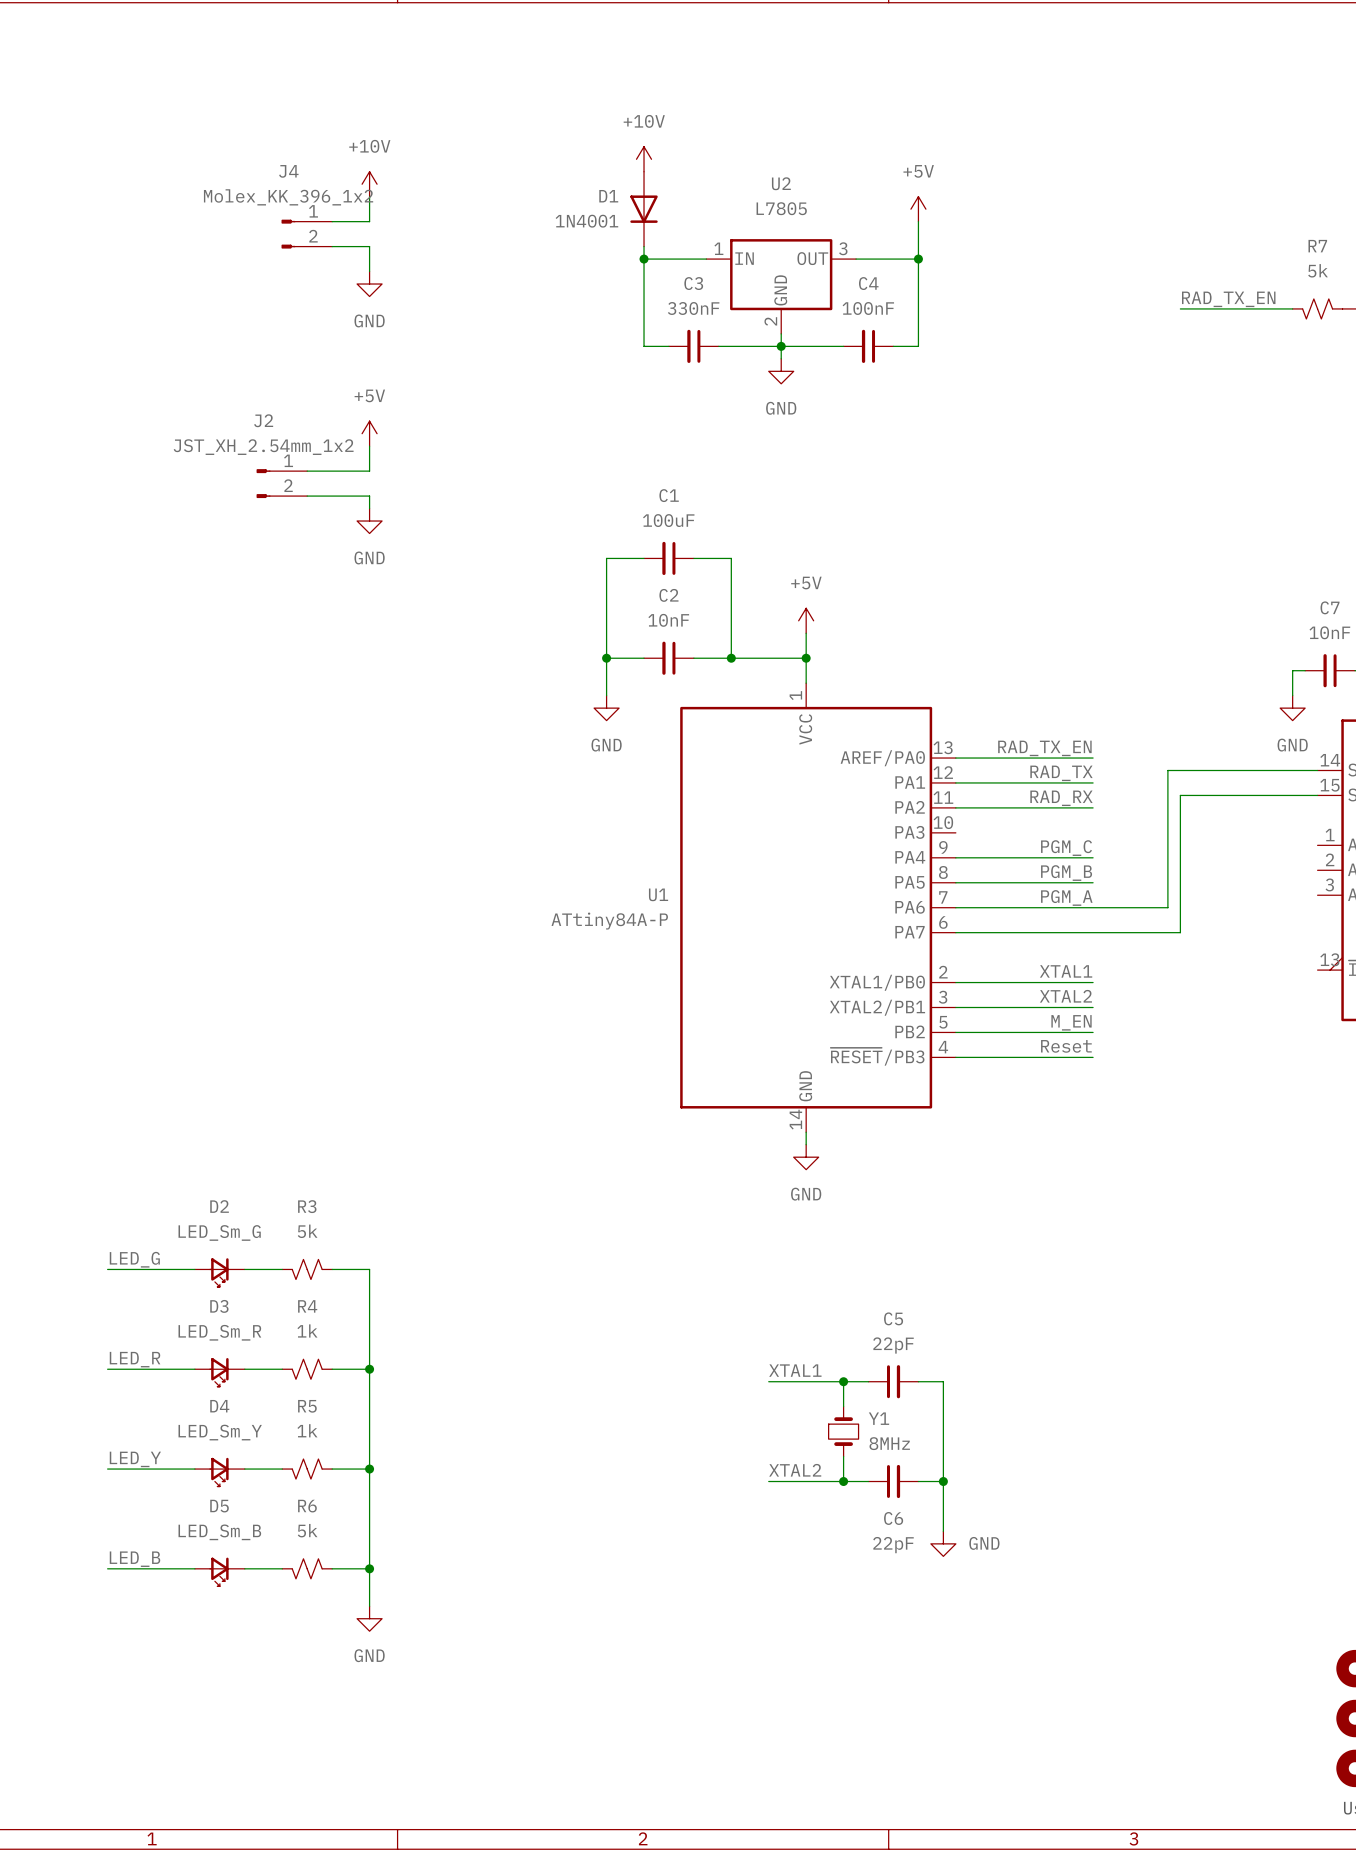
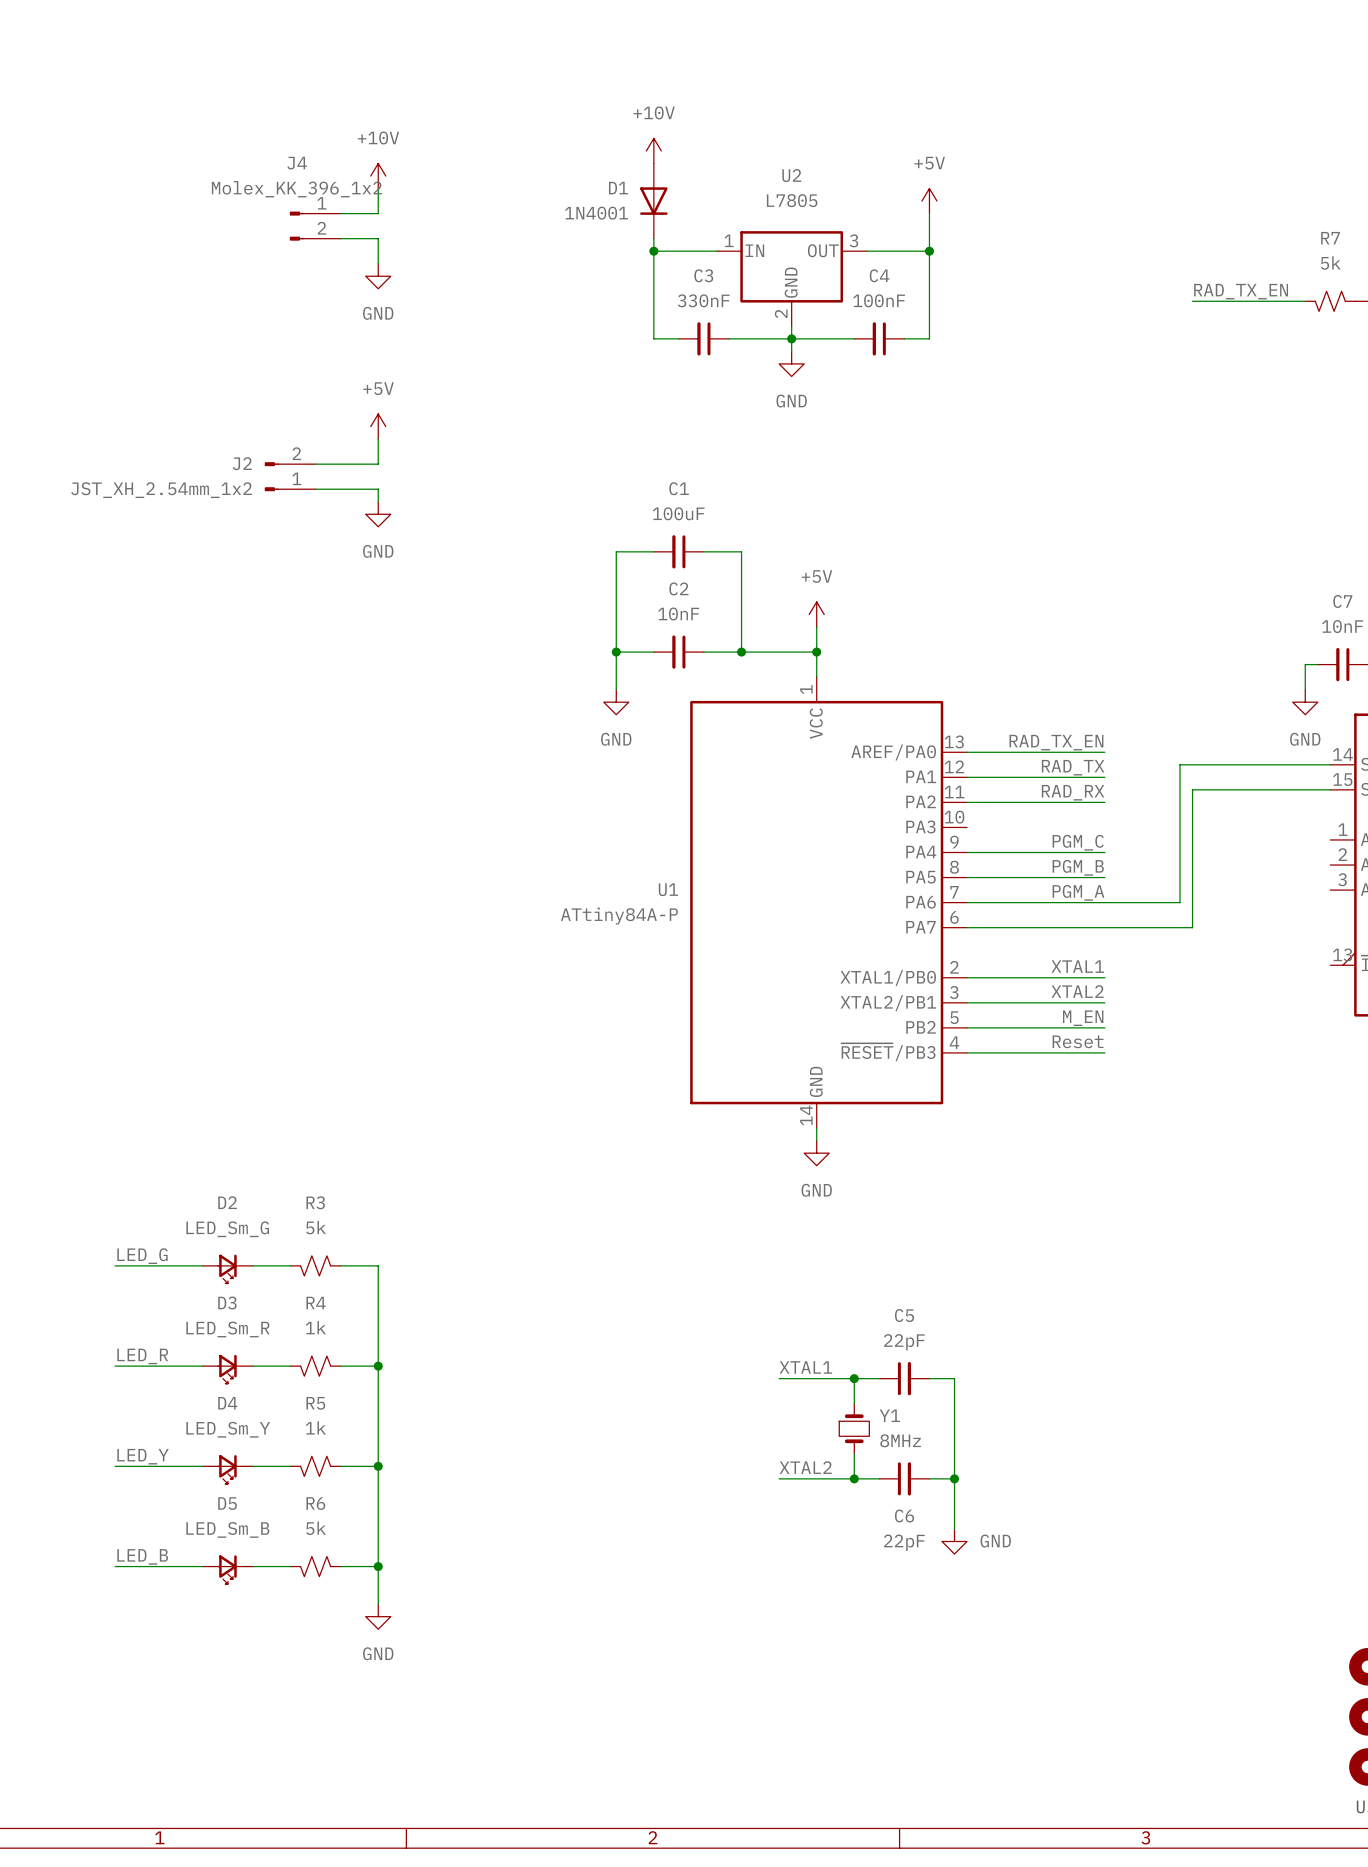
J2 name position: J2 (263, 420) -> J2 (242, 463)
J2 value position: JST_XH_2.54mm_1x2 (263, 447) -> JST_XH_2.54mm_1x2 (161, 490)
J2 flip: as is (263, 483) -> up-down (271, 476)

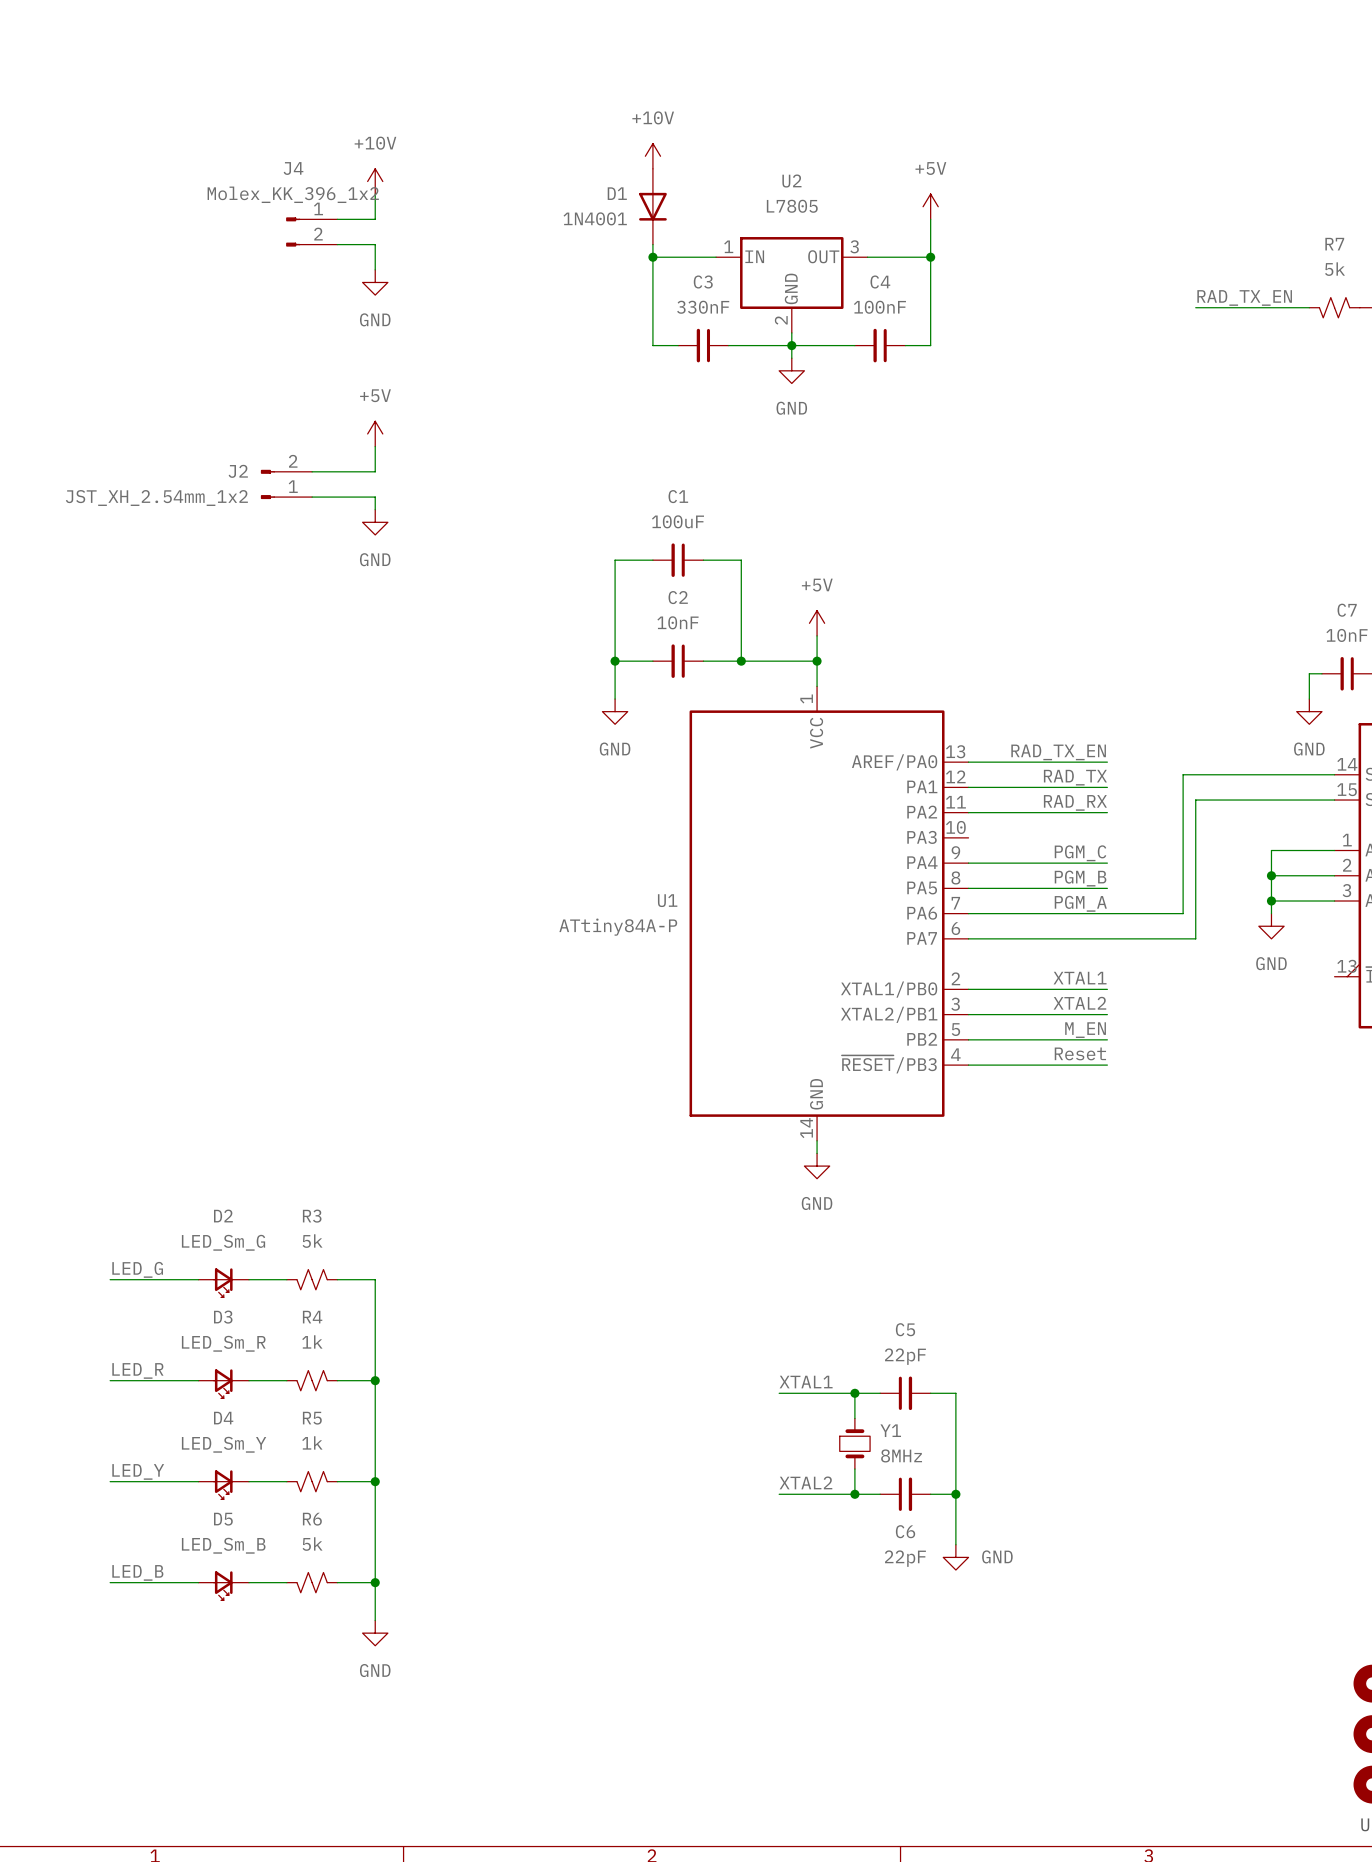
wire: none -> (1334, 850) (1271, 850) (1271, 913)
wire: none -> (1271, 875) (1334, 875)
junction: none -> (1271, 875)
wire: none -> (1271, 901) (1334, 901)
junction: none -> (1271, 901)
power symbol: none -> GND (1271, 926)

